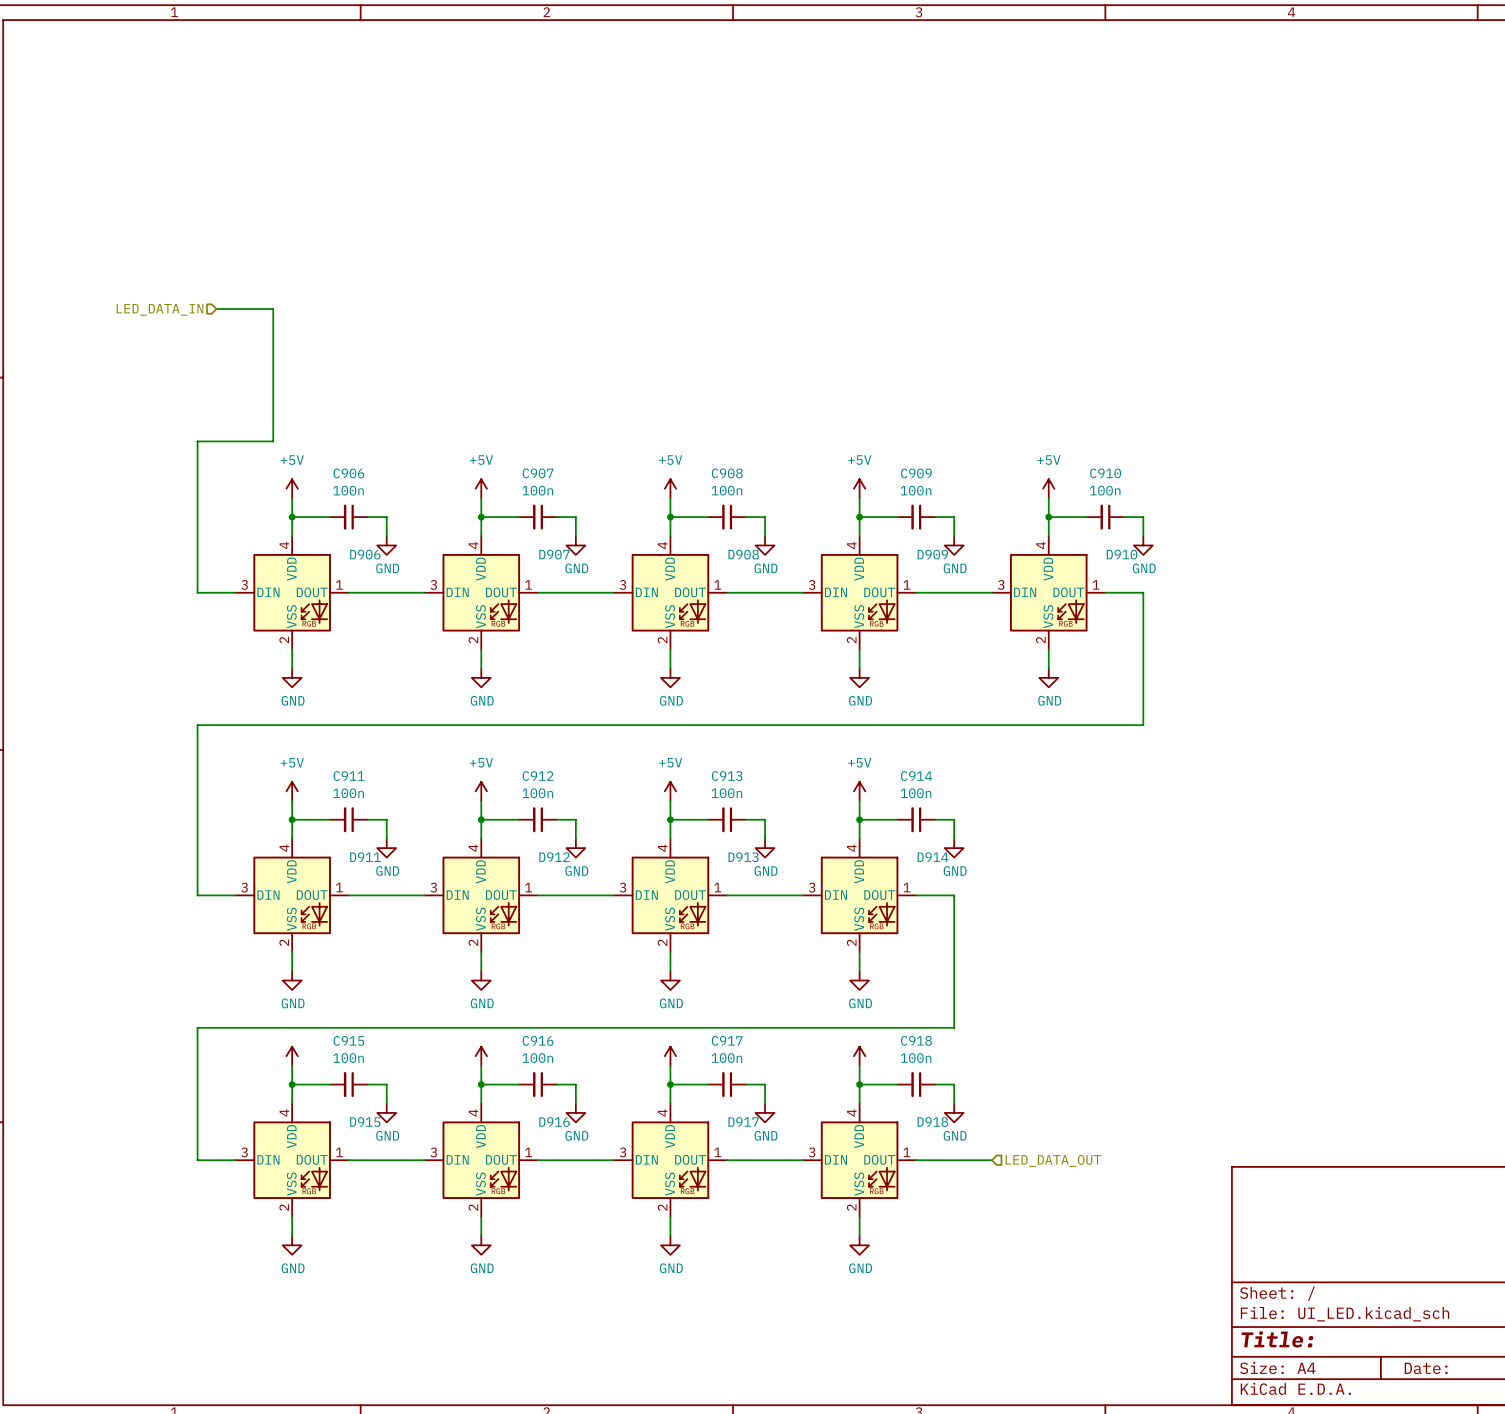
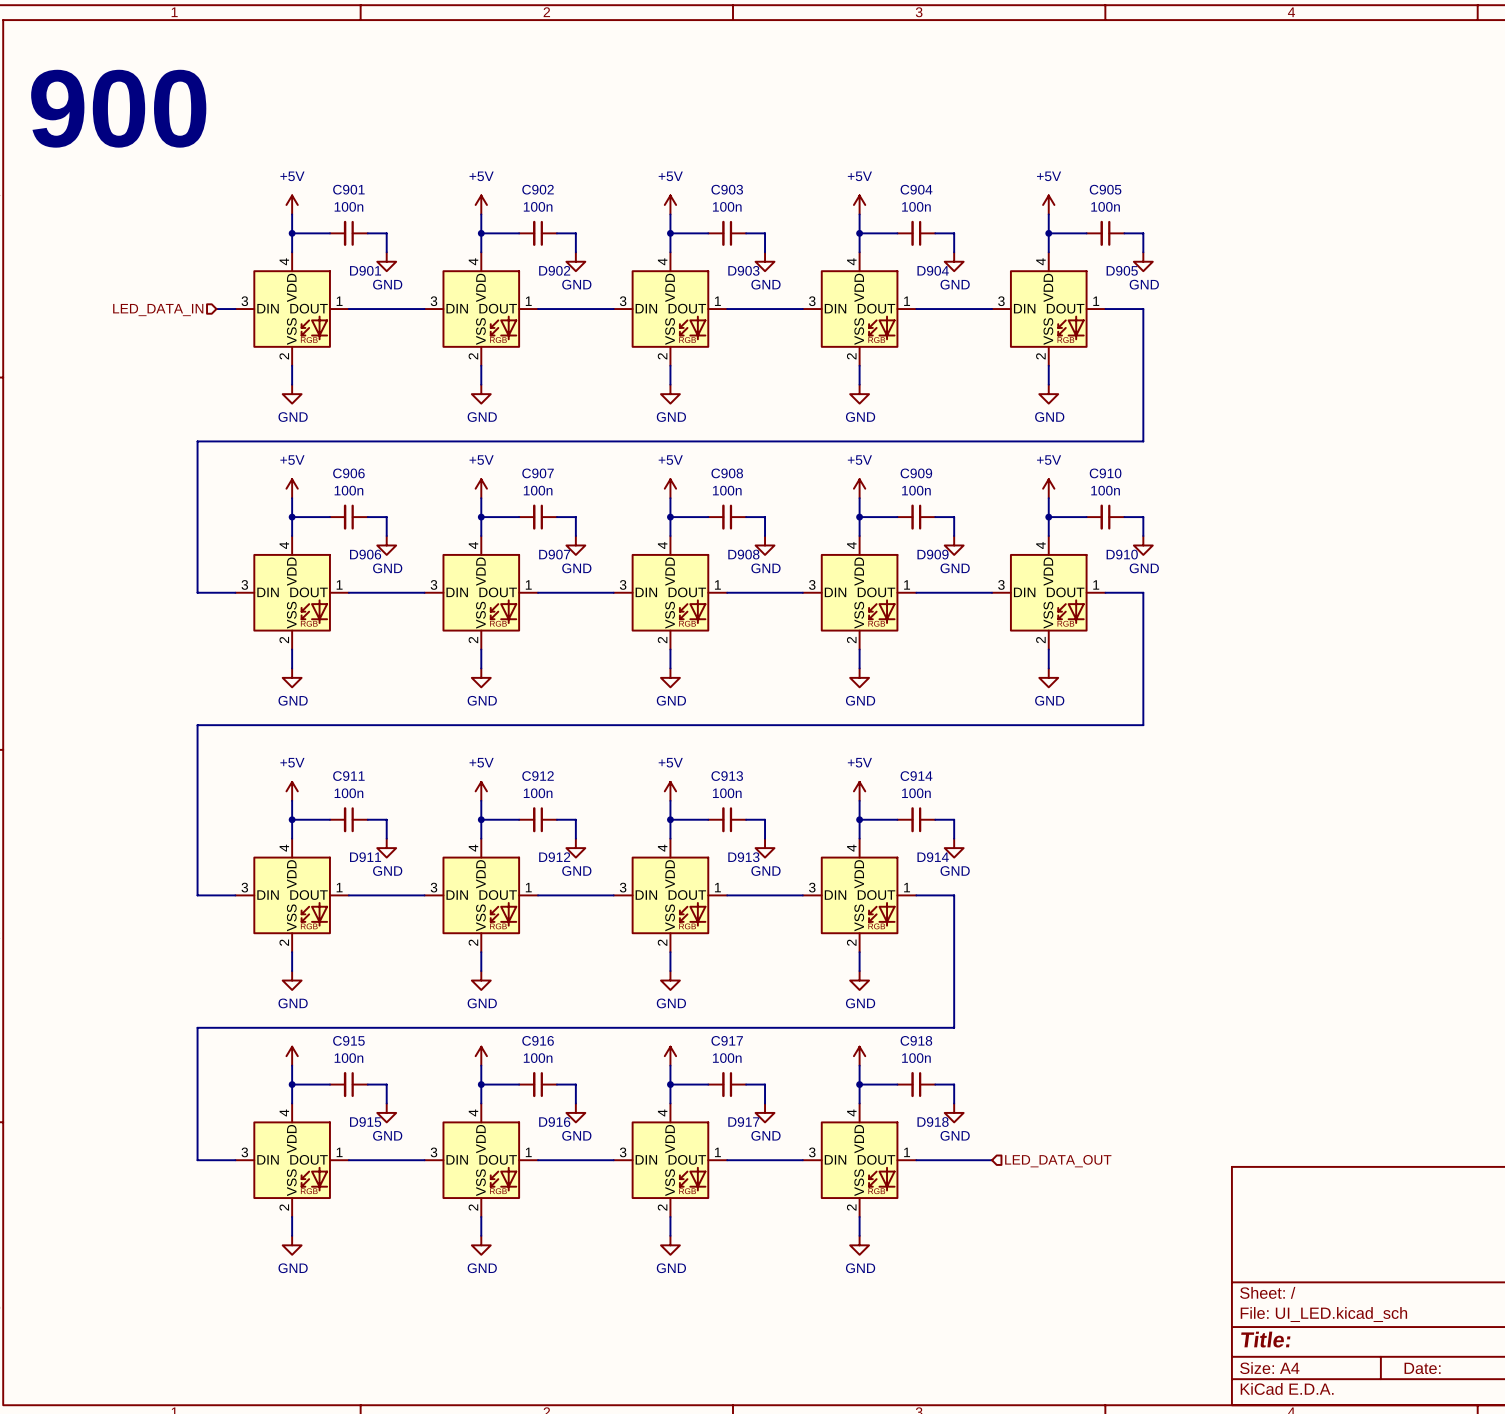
text: none -> 900 (118, 108)
power symbol: none -> +5V (292, 204)
power symbol: none -> +5V (481, 204)
power symbol: none -> +5V (670, 204)
power symbol: none -> +5V (859, 204)
power symbol: none -> +5V (1048, 204)
wire: none -> (292, 214) (292, 252)
wire: none -> (481, 214) (481, 252)
wire: none -> (670, 214) (670, 252)
wire: none -> (859, 214) (859, 252)
wire: none -> (1048, 214) (1048, 252)
wire: none -> (292, 233) (329, 233)
junction: none -> (292, 233)
C901: none -> 100n (348, 233)
wire: none -> (367, 233) (386, 233) (386, 252)
wire: none -> (481, 233) (519, 233)
junction: none -> (481, 233)
C902: none -> 100n (538, 233)
wire: none -> (556, 233) (575, 233) (575, 252)
wire: none -> (670, 233) (708, 233)
junction: none -> (670, 233)
C903: none -> 100n (727, 233)
wire: none -> (746, 233) (765, 233) (765, 252)
wire: none -> (859, 233) (897, 233)
junction: none -> (859, 233)
C904: none -> 100n (916, 233)
wire: none -> (935, 233) (954, 233) (954, 252)
wire: none -> (1048, 233) (1086, 233)
junction: none -> (1048, 233)
C905: none -> 100n (1105, 233)
wire: none -> (1124, 233) (1143, 233) (1143, 252)
power symbol: none -> GND (386, 261)
power symbol: none -> GND (575, 261)
power symbol: none -> GND (765, 261)
power symbol: none -> GND (954, 261)
power symbol: none -> GND (1143, 261)
wire: (235, 309) (273, 309) (273, 441) -> (1105, 309) (1143, 309) (1143, 441) (273, 441)
D901: none -> (292, 309)
wire: none -> (348, 309) (424, 309)
D902: none -> (481, 309)
wire: none -> (538, 309) (613, 309)
D903: none -> (670, 309)
wire: none -> (727, 309) (802, 309)
D904: none -> (859, 309)
wire: none -> (916, 309) (992, 309)
D905: none -> (1048, 309)
wire: none -> (292, 365) (292, 384)
wire: none -> (481, 365) (481, 384)
wire: none -> (670, 365) (670, 384)
wire: none -> (859, 365) (859, 384)
wire: none -> (1048, 365) (1048, 384)
power symbol: none -> GND (292, 394)
power symbol: none -> GND (481, 394)
power symbol: none -> GND (670, 394)
power symbol: none -> GND (859, 394)
power symbol: none -> GND (1048, 394)

